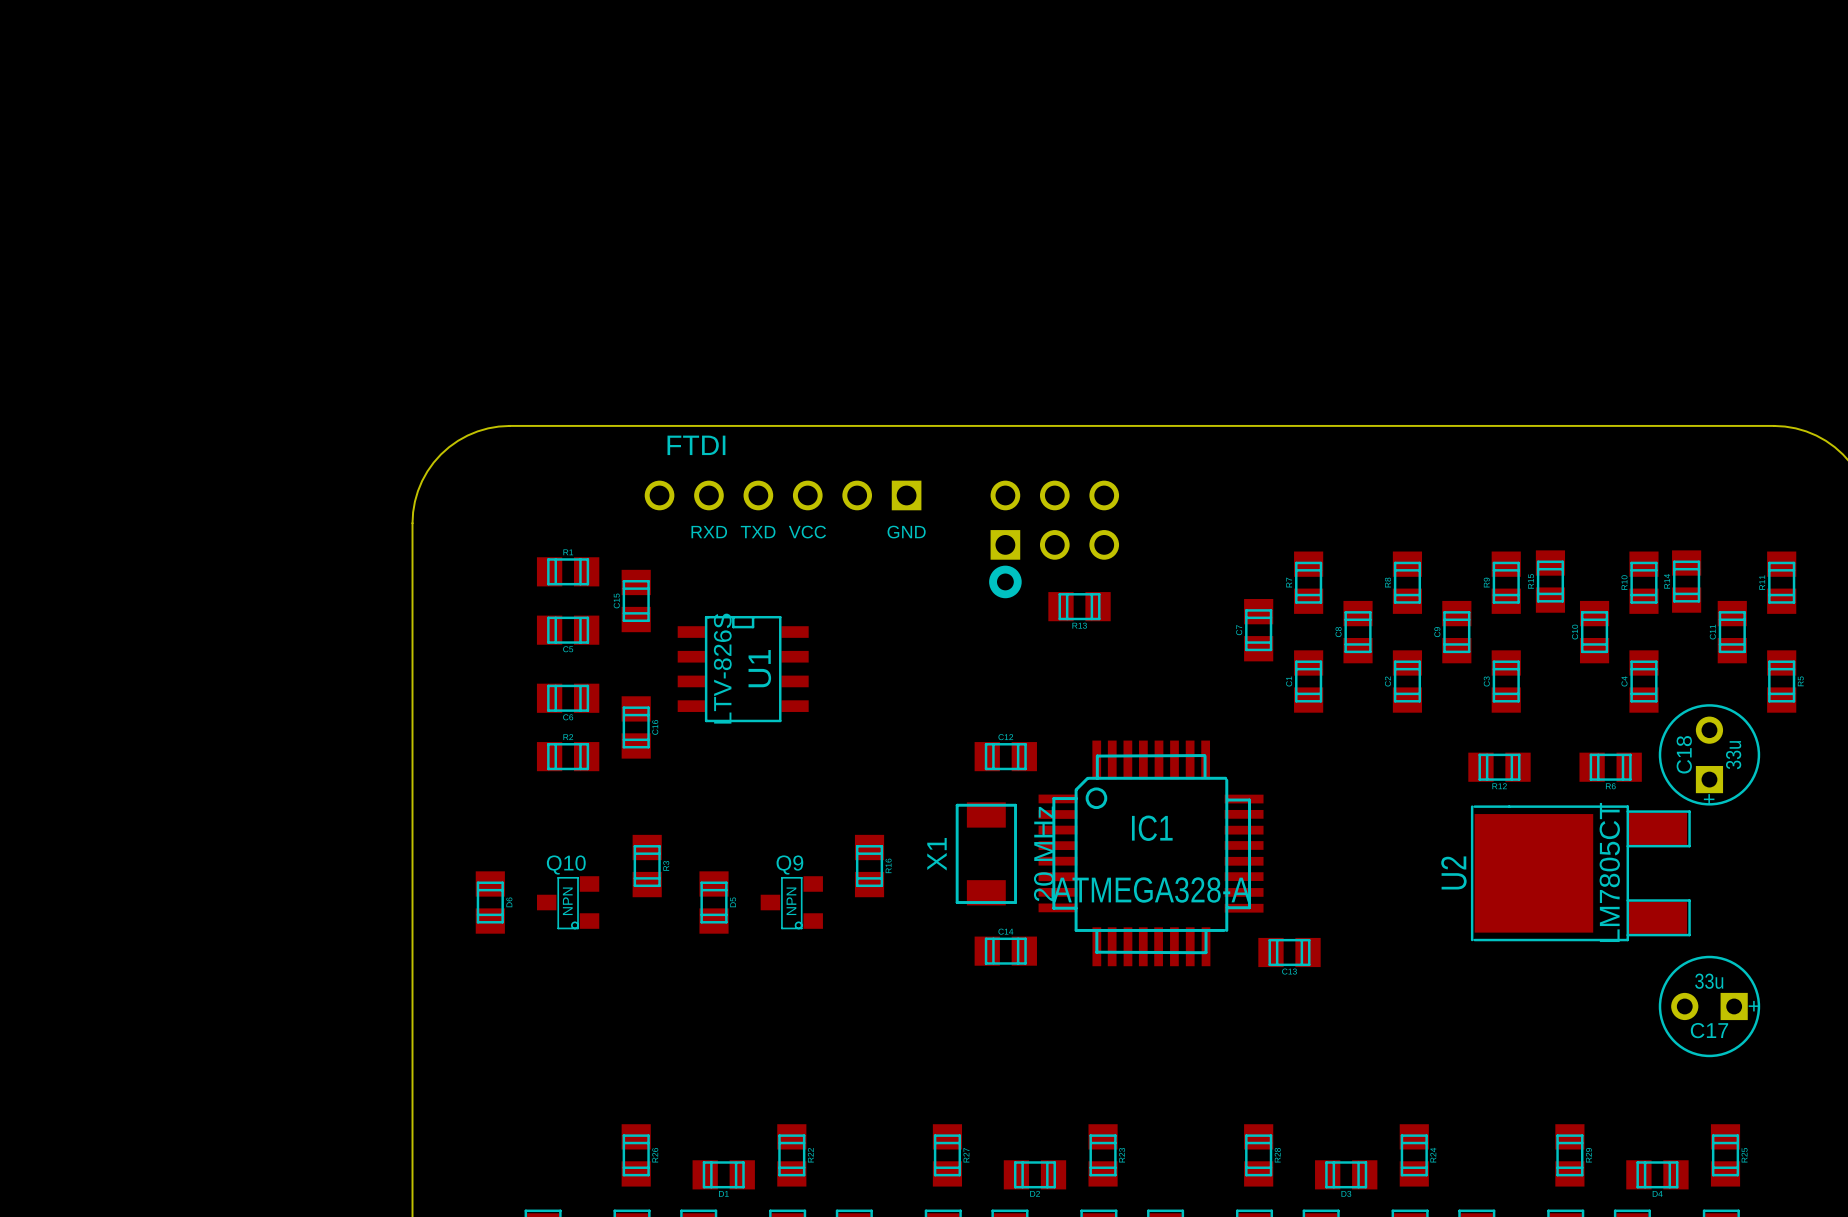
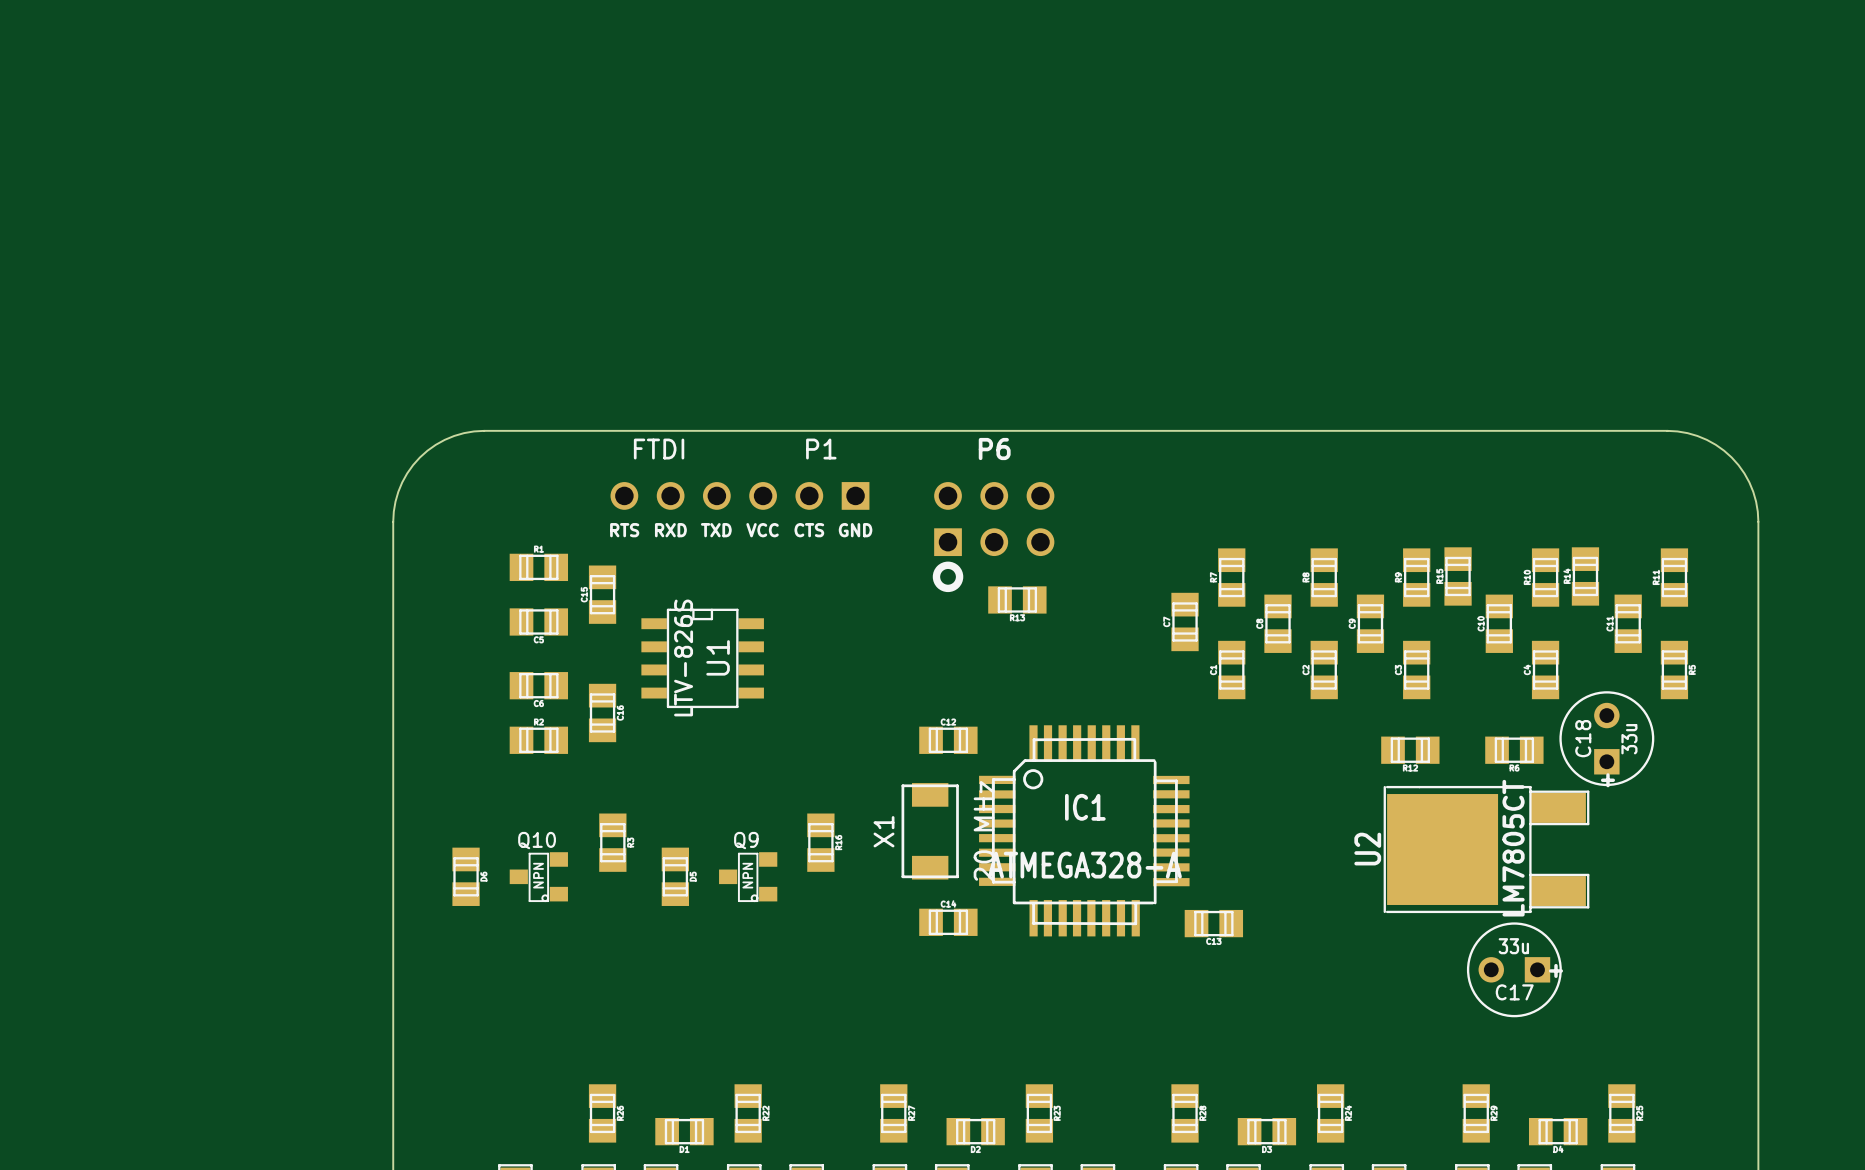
P1 name: none -> P1 (821, 449)
P6 name: none -> P6 (994, 449)
P1 text: none -> RTS (624, 530)
P1 text: none -> CTS (809, 530)
C17 position: (1709, 1006) -> (1514, 969)

